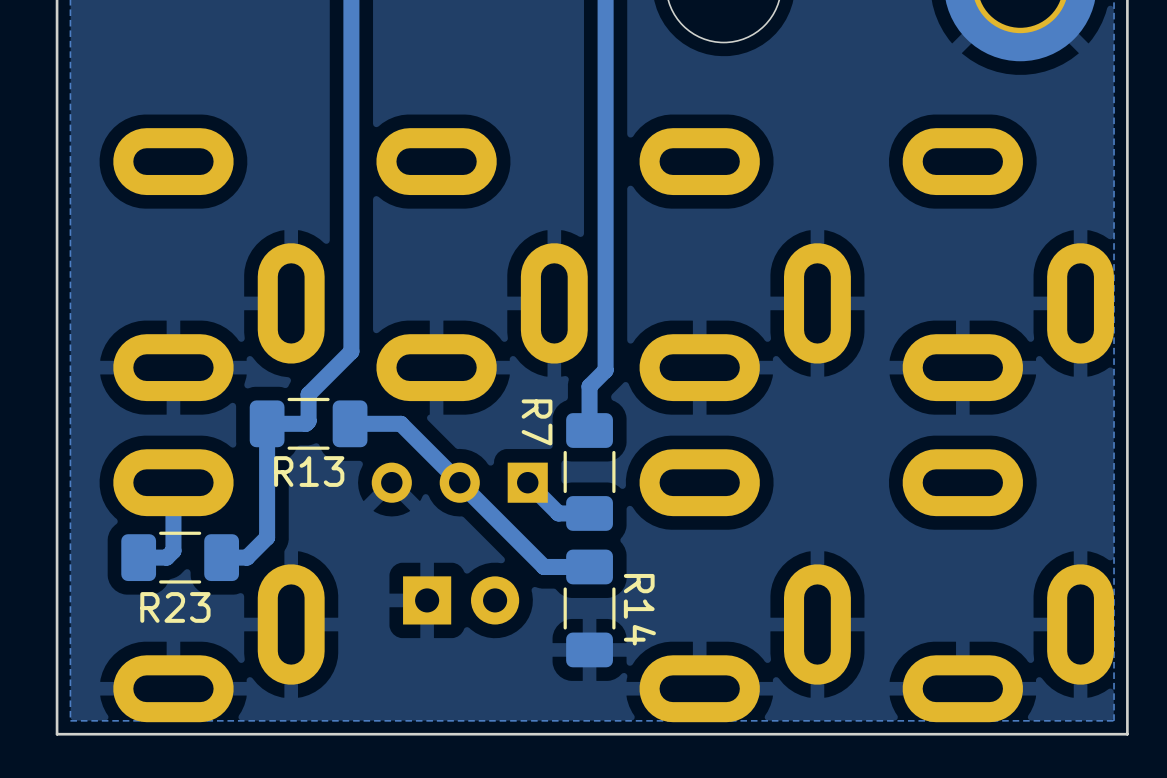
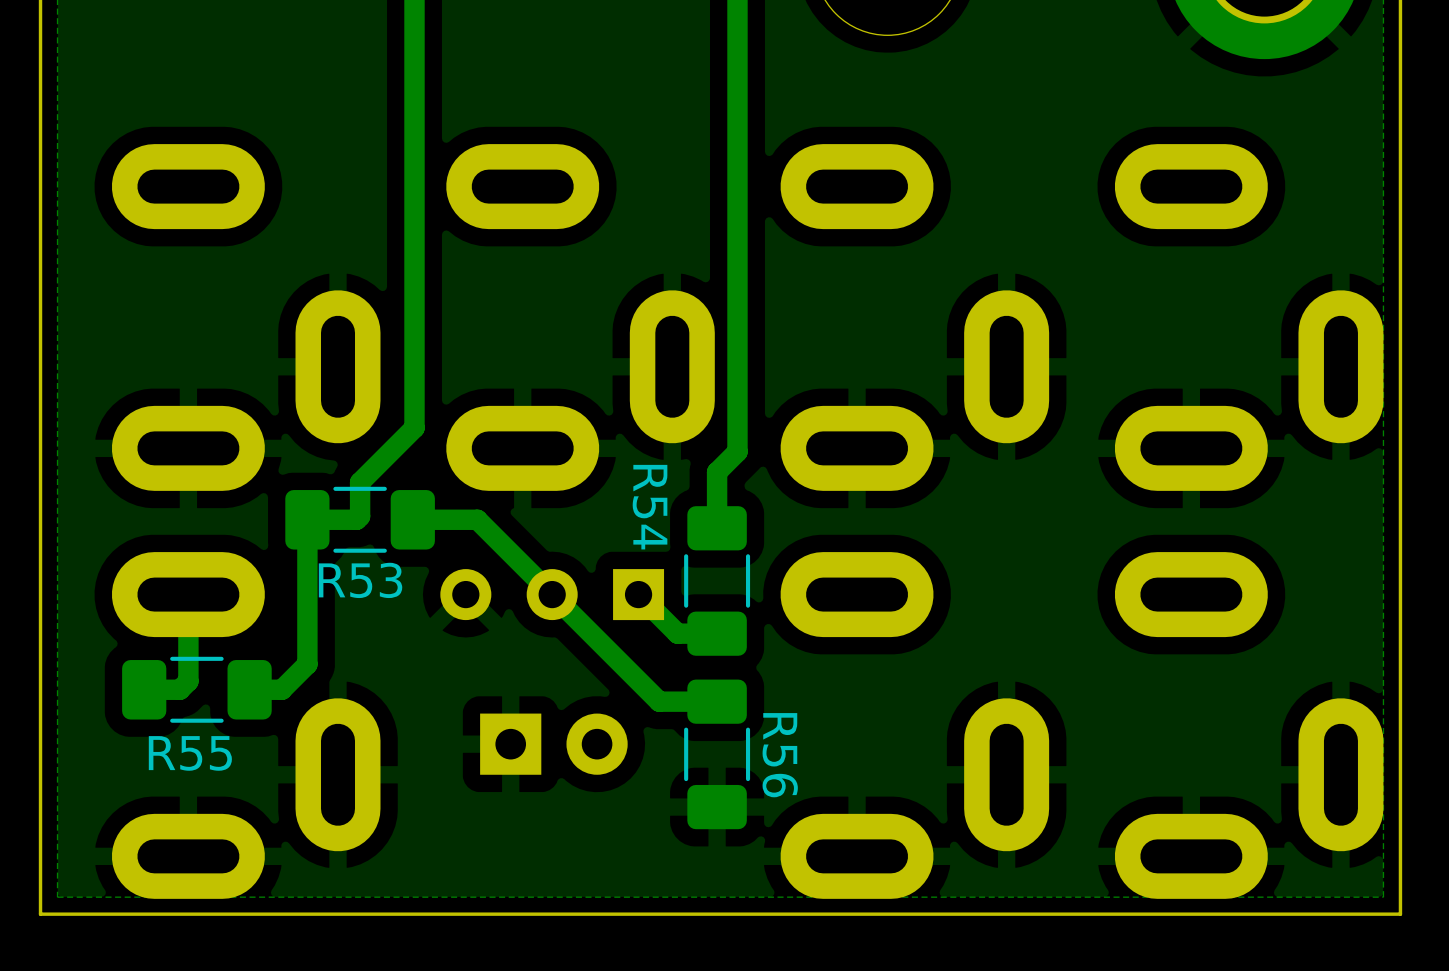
R7 name: R7 (537, 422) -> R54 (650, 507)
R13 name: R13 (309, 471) -> R53 (360, 580)
R23 name: R23 (175, 607) -> R55 (190, 753)
R14 name: R14 (639, 609) -> R56 (780, 755)

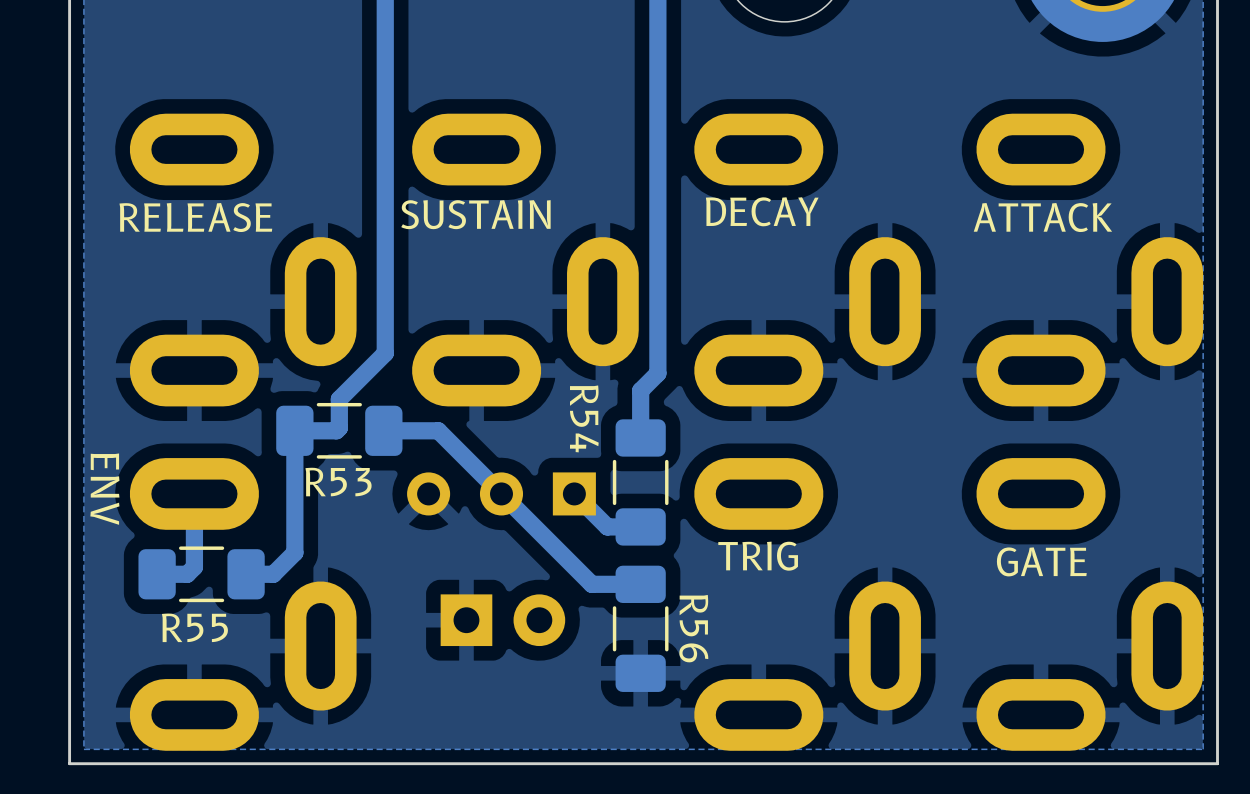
text: none -> DECAY (762, 211)
text: none -> SUSTAIN (475, 214)
text: none -> RELEASE (195, 217)
text: none -> ATTACK (1042, 217)
text: none -> ENV (104, 489)
text: none -> TRIG (758, 556)
text: none -> GATE (1041, 561)

